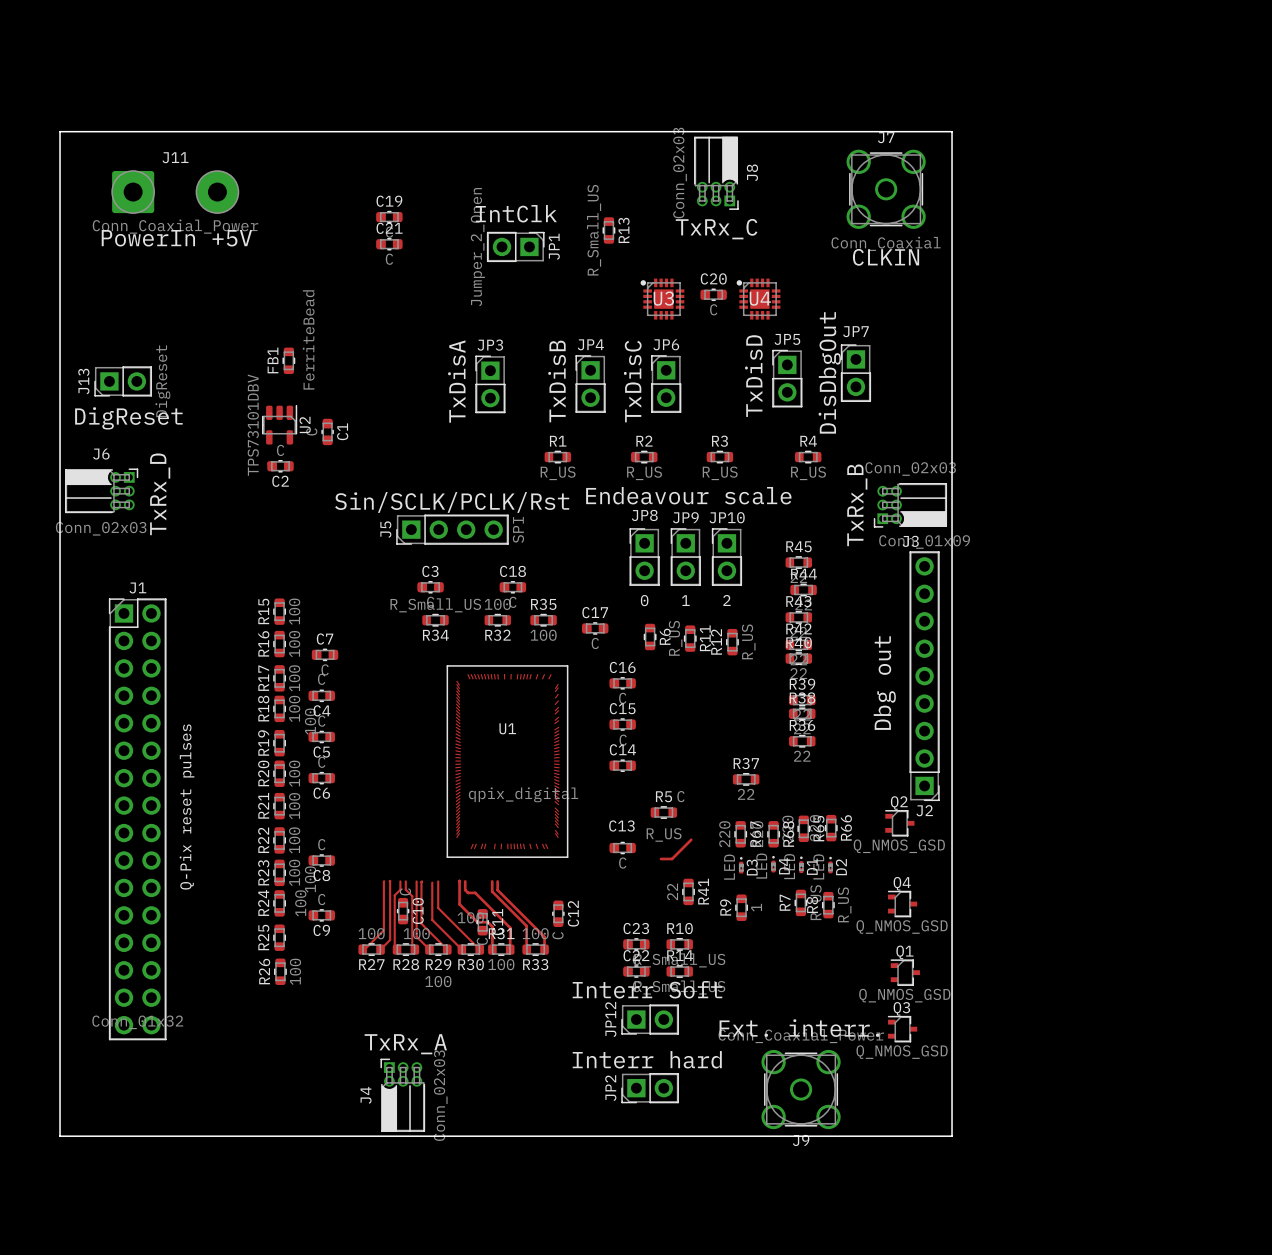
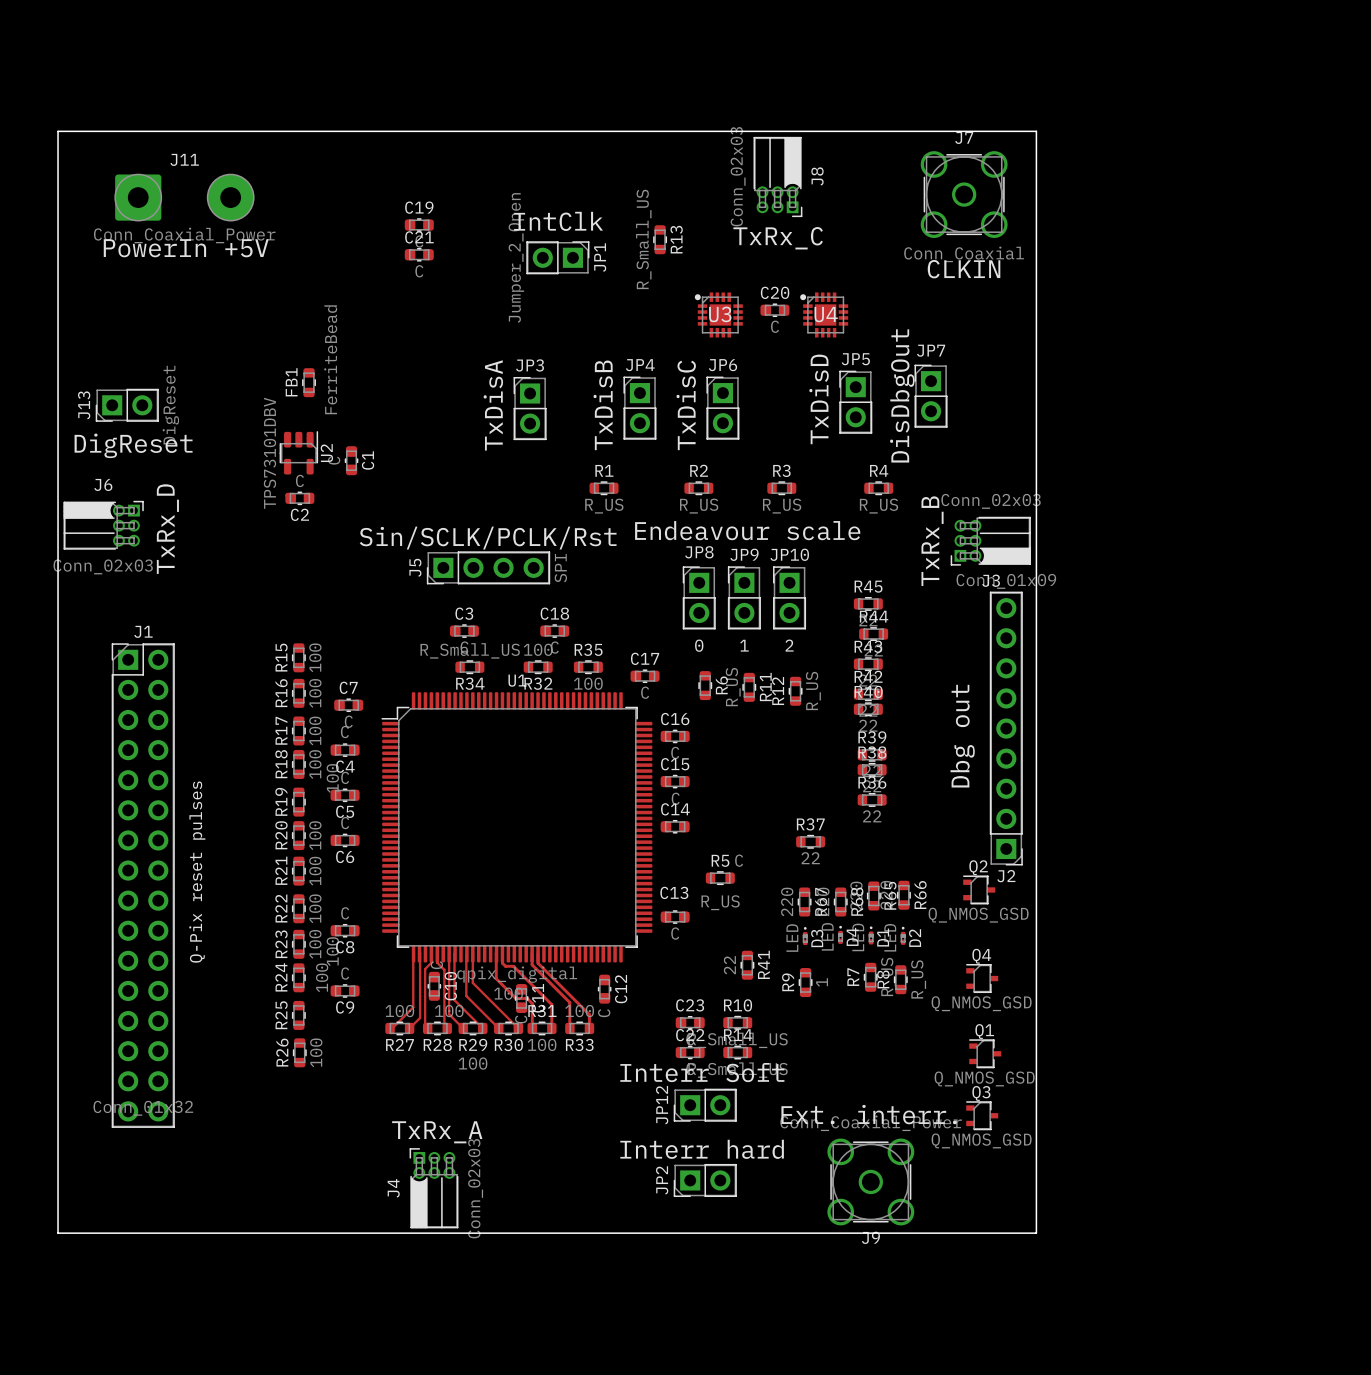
U1 footprint: [446, 665, 569, 858] -> [381, 692, 653, 963]
U1 name position: U1 (507, 728) -> U1 (517, 680)
U1 value position: qpix_digital (523, 794) -> qpix_digital (517, 974)
top track: (691, 839) (672, 858) (661, 858) -> none

